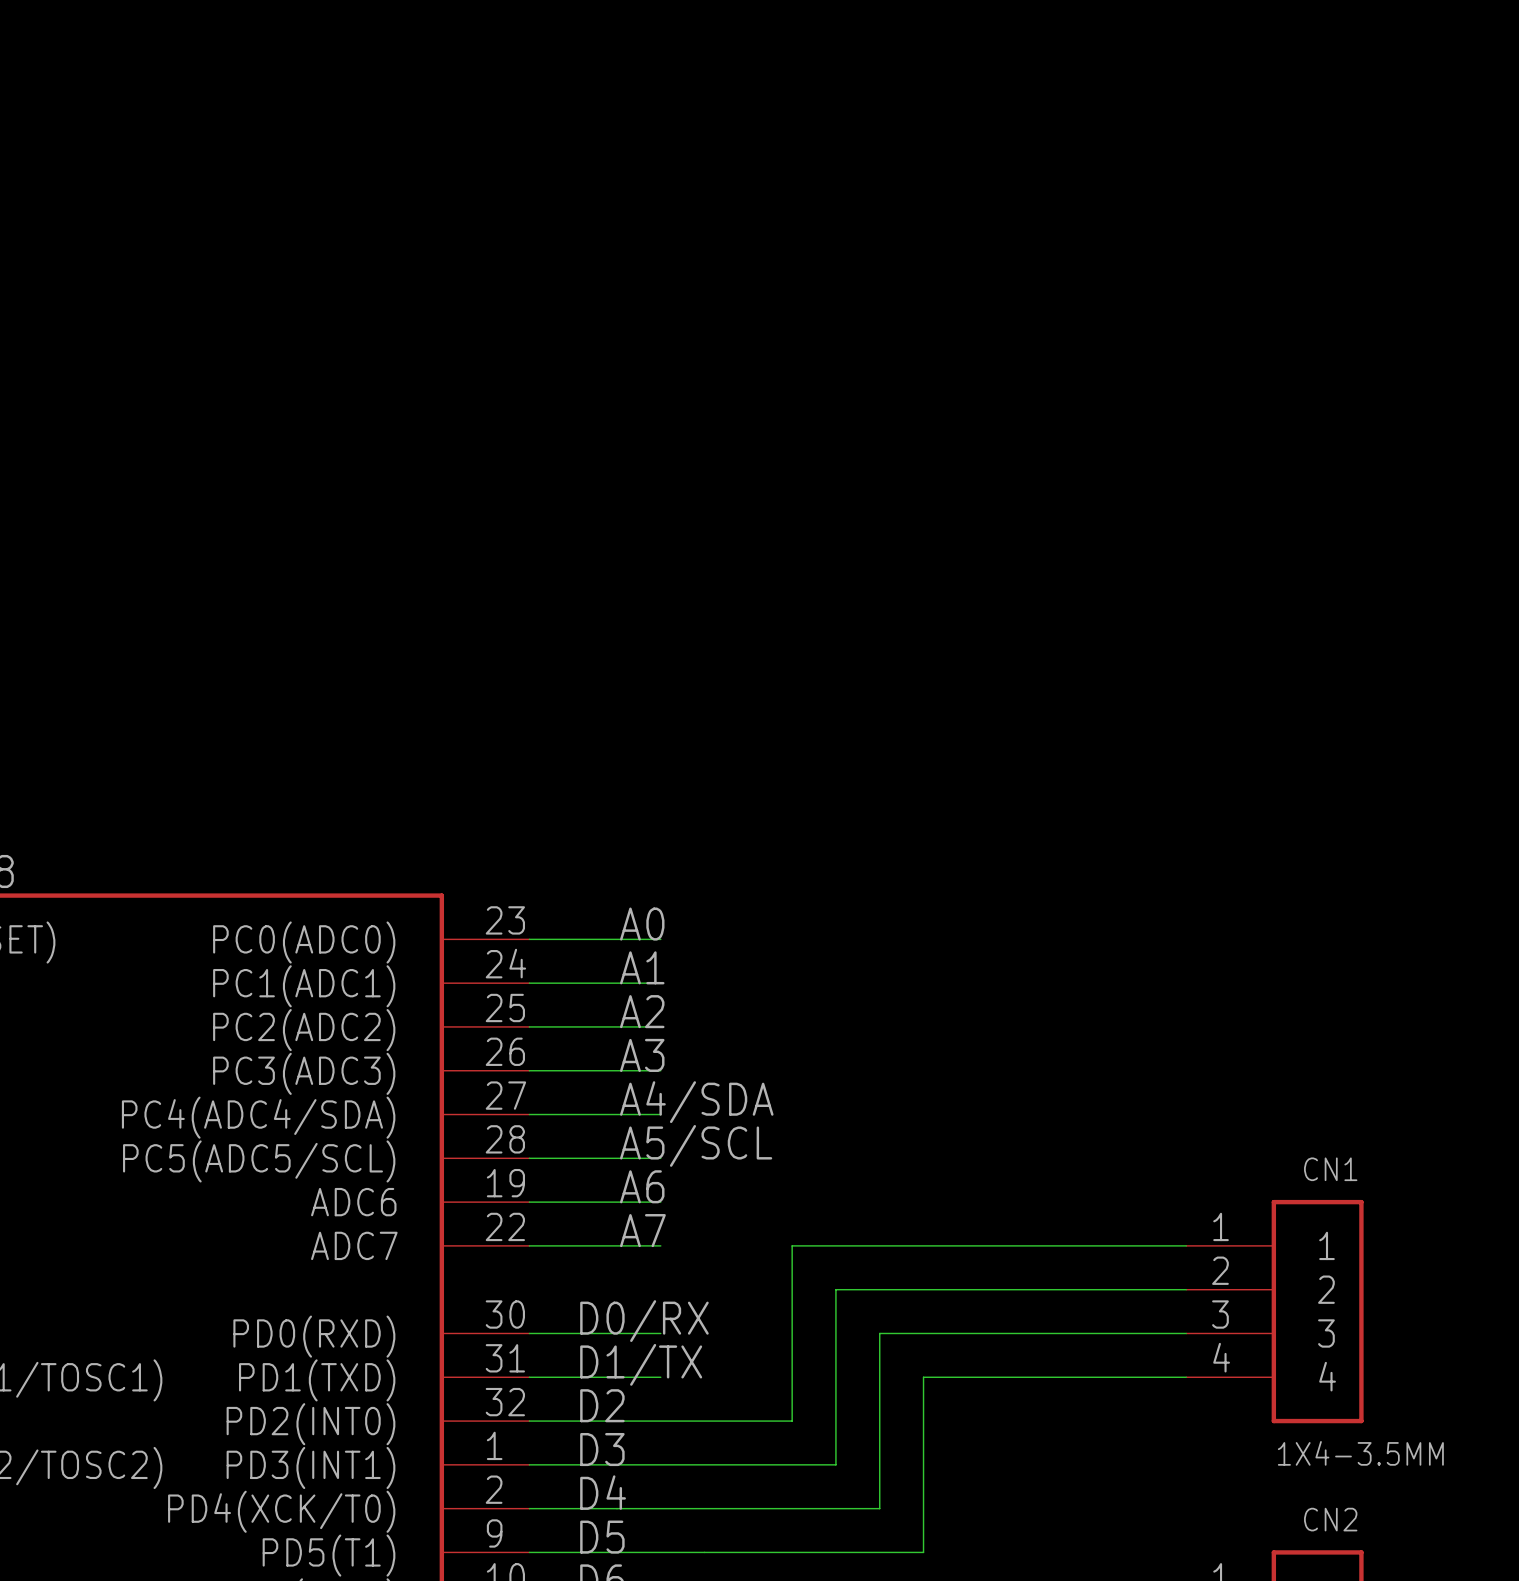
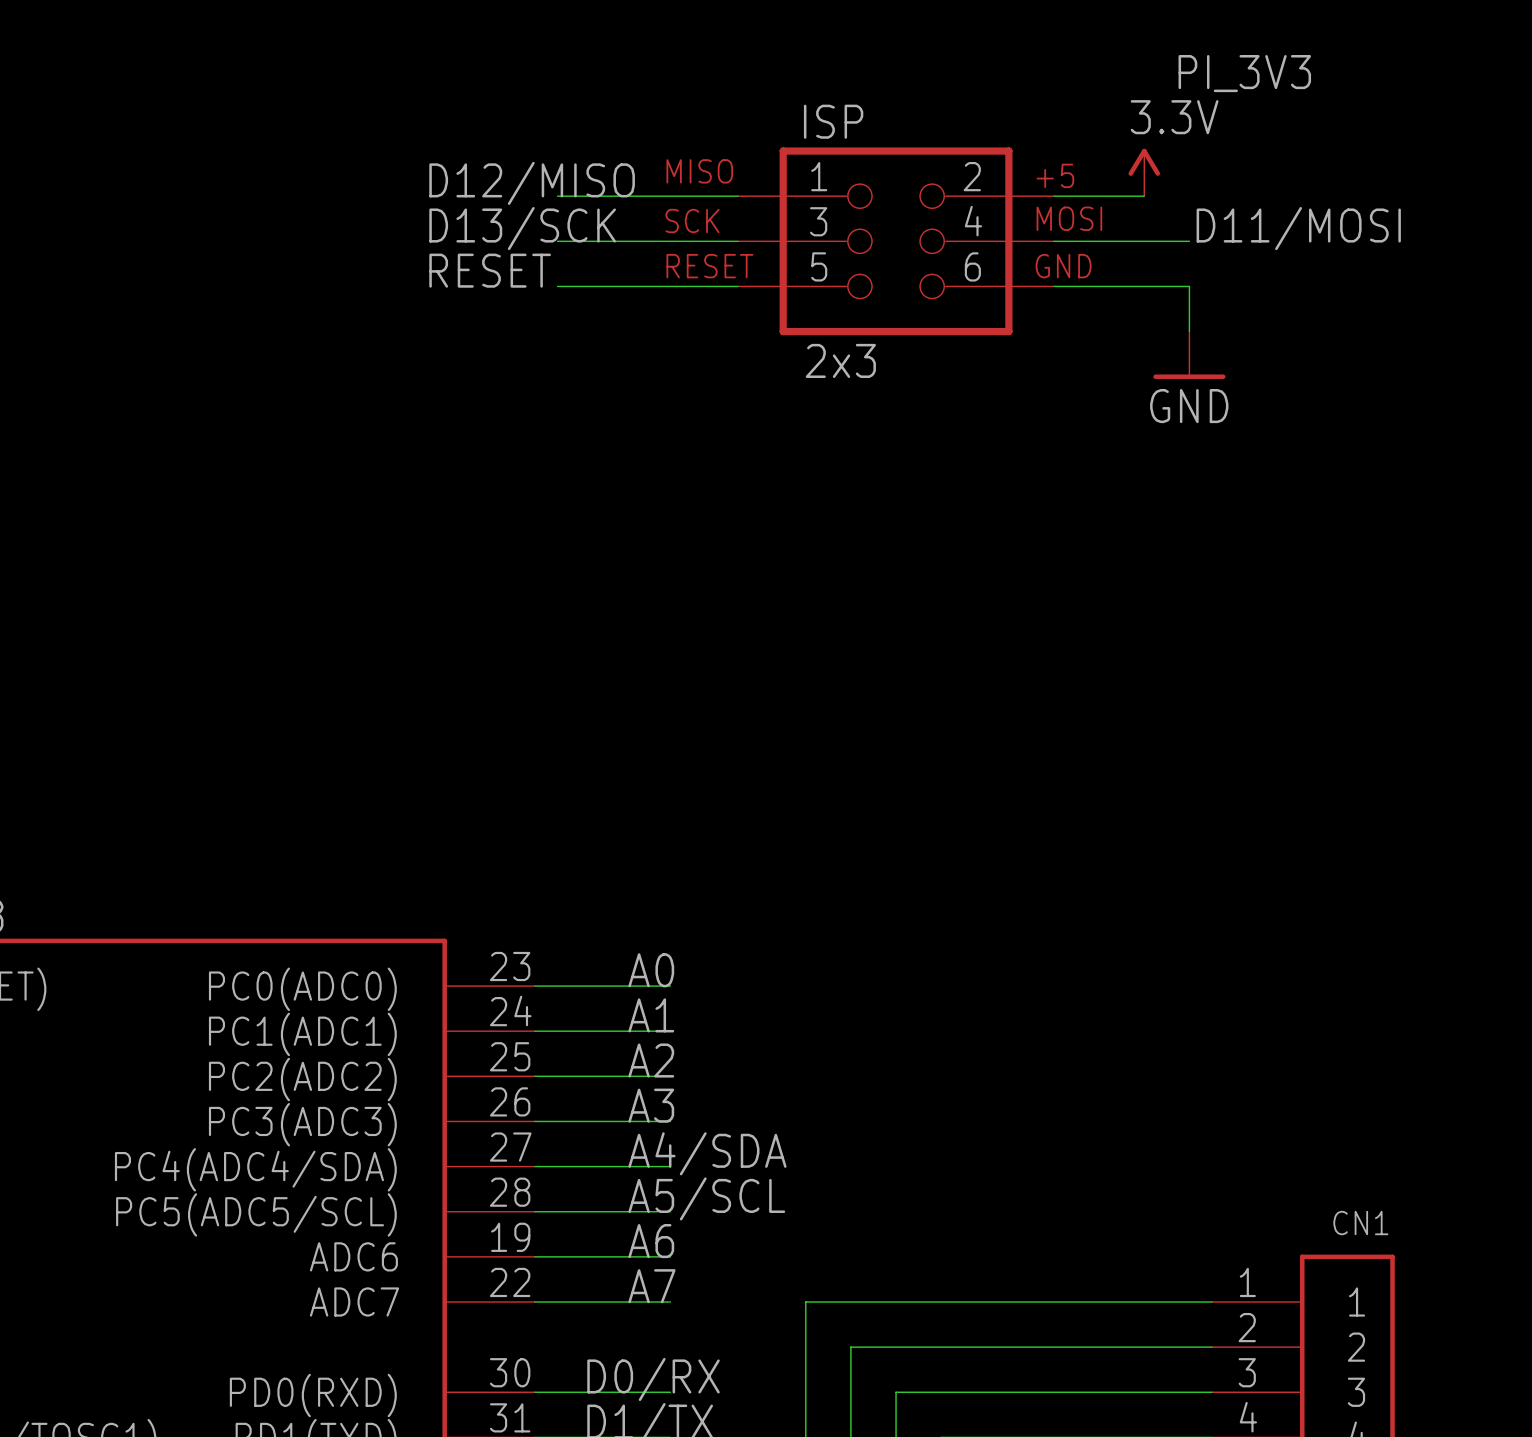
label: none -> PI_3V3 (1244, 73)
power symbol: none -> 3.3V (1144, 172)
label: none -> D12/MISO (532, 183)
wire: none -> (557, 196) (738, 196)
wire: none -> (1054, 196) (1144, 196)
label: none -> D13/SCK (522, 228)
label: none -> D11/MOSI (1298, 228)
wire: none -> (557, 241) (738, 241)
ISP: none -> 2x3 (896, 241)
wire: none -> (1054, 241) (1189, 241)
label: none -> RESET (490, 270)
wire: none -> (557, 286) (738, 286)
wire: none -> (1054, 286) (1189, 286) (1189, 331)
power symbol: none -> GND (1189, 355)

